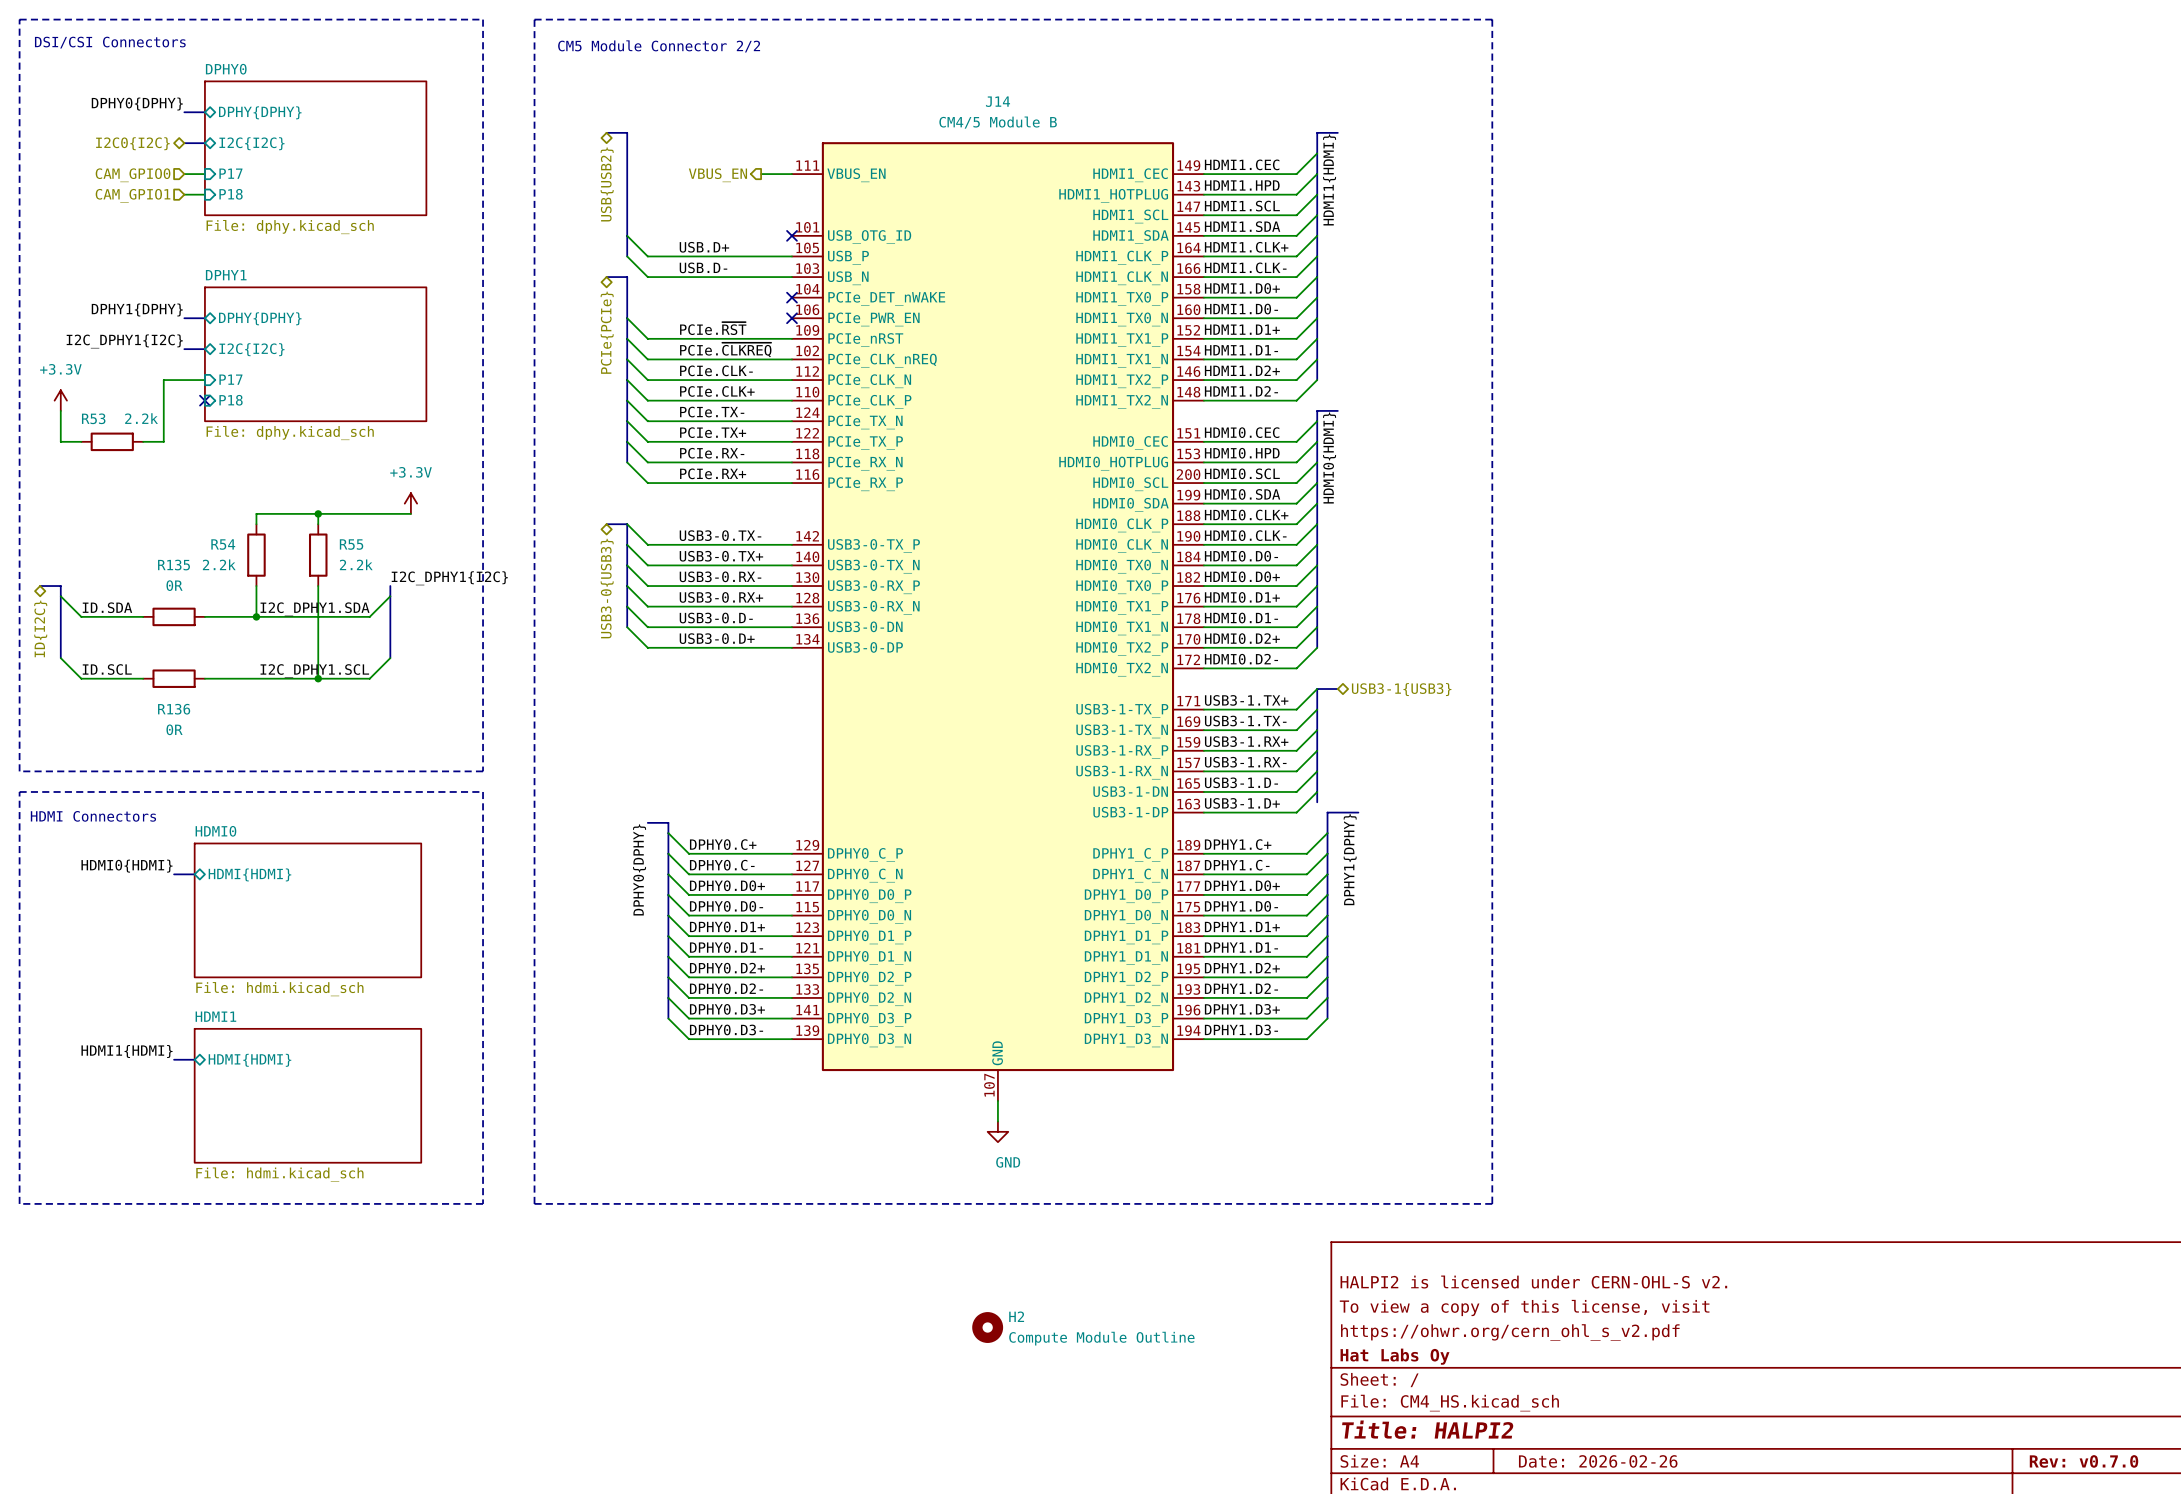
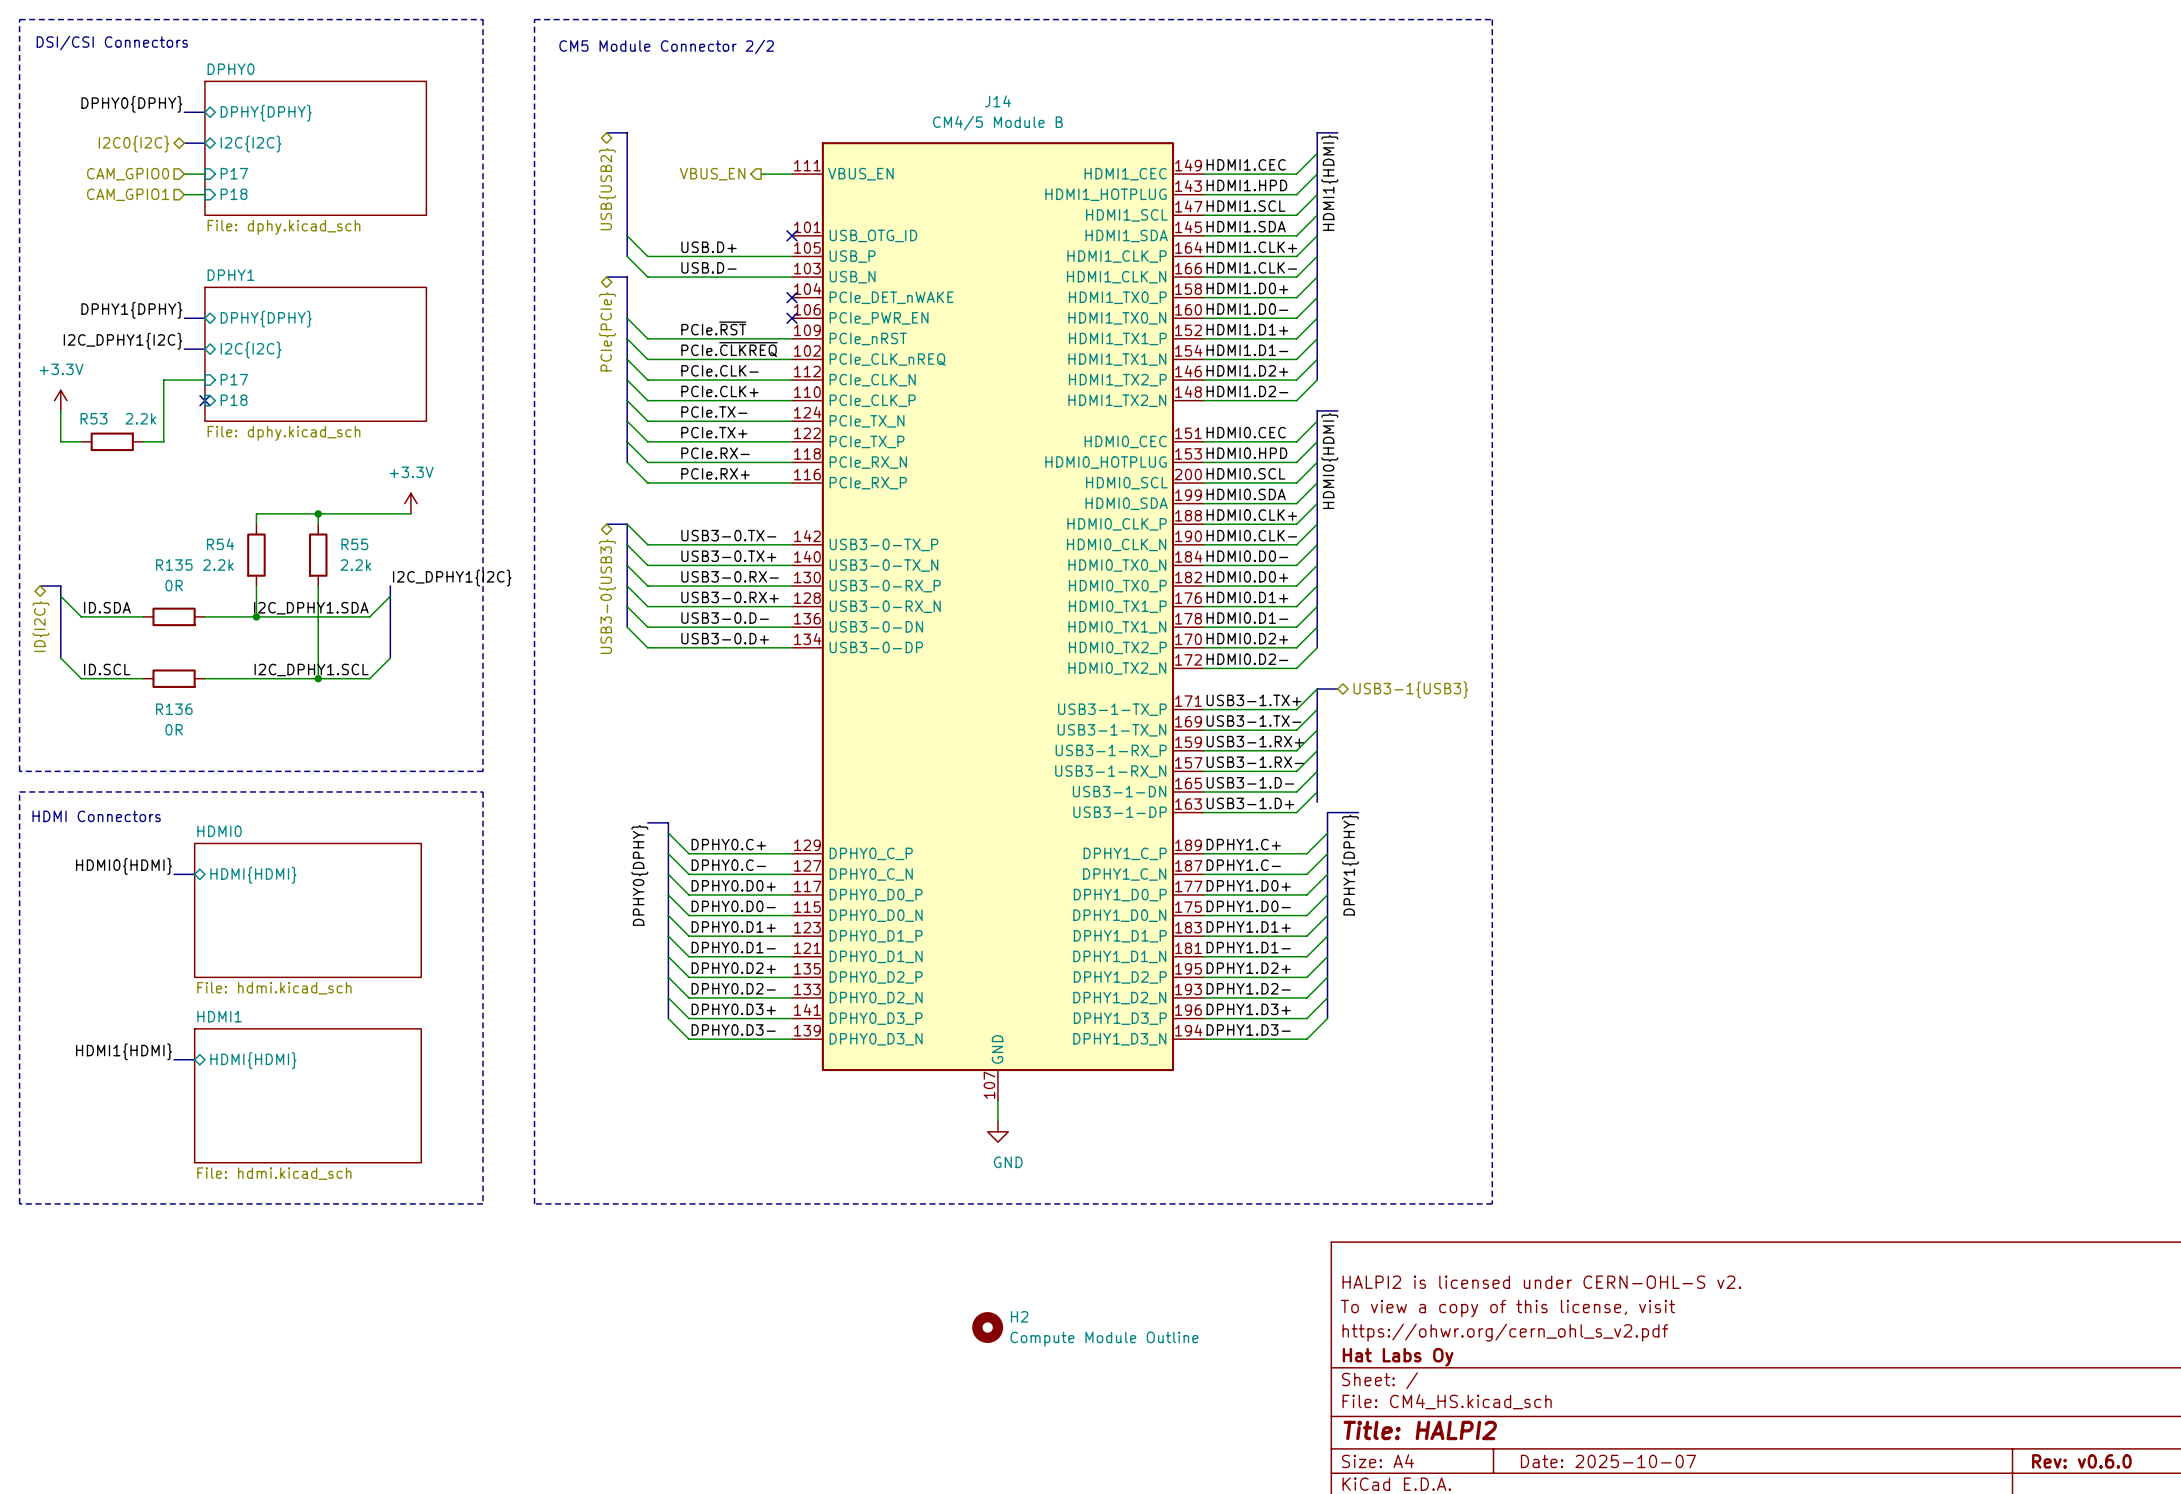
title block: Date: 2026-02-26 (1598, 1461) -> Date: 2025-10-07 (1608, 1461)
title block: Rev: v0.7.0 (2084, 1461) -> Rev: v0.6.0 (2081, 1461)

